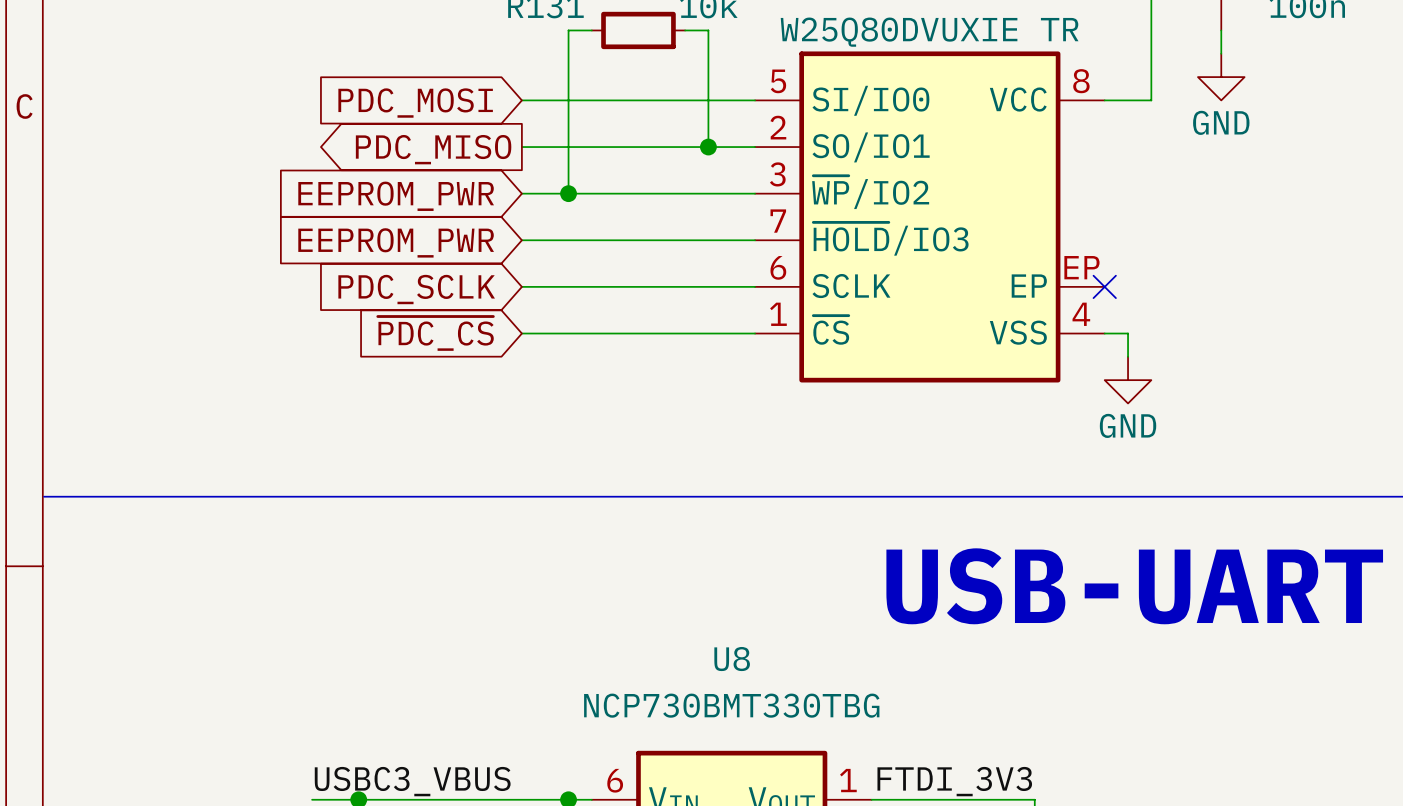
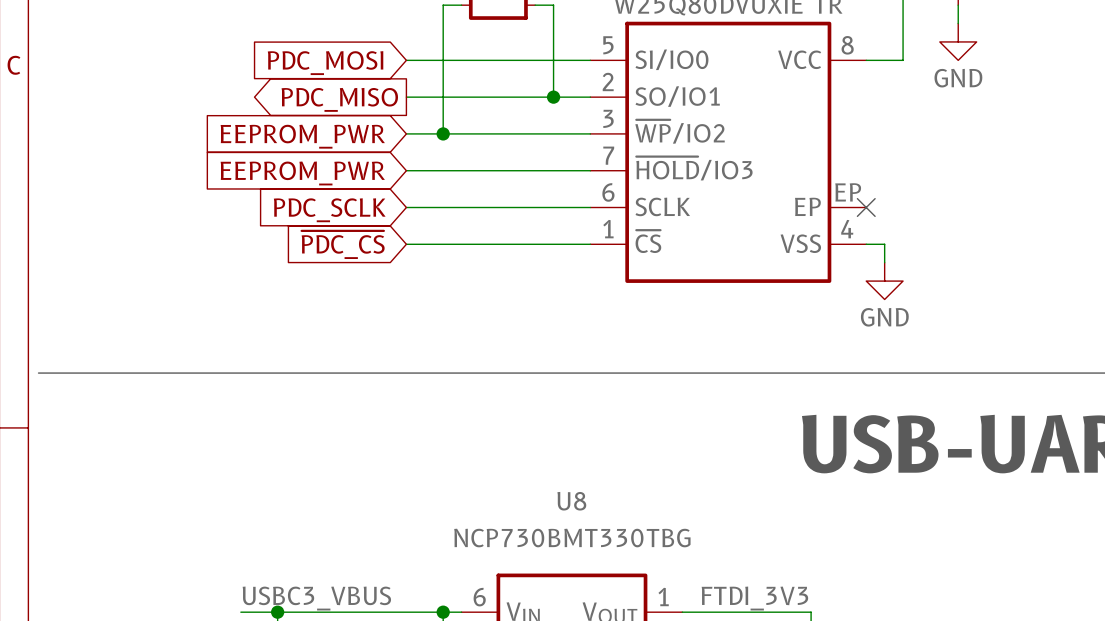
line: (44, 496) (55, 496) -> none

